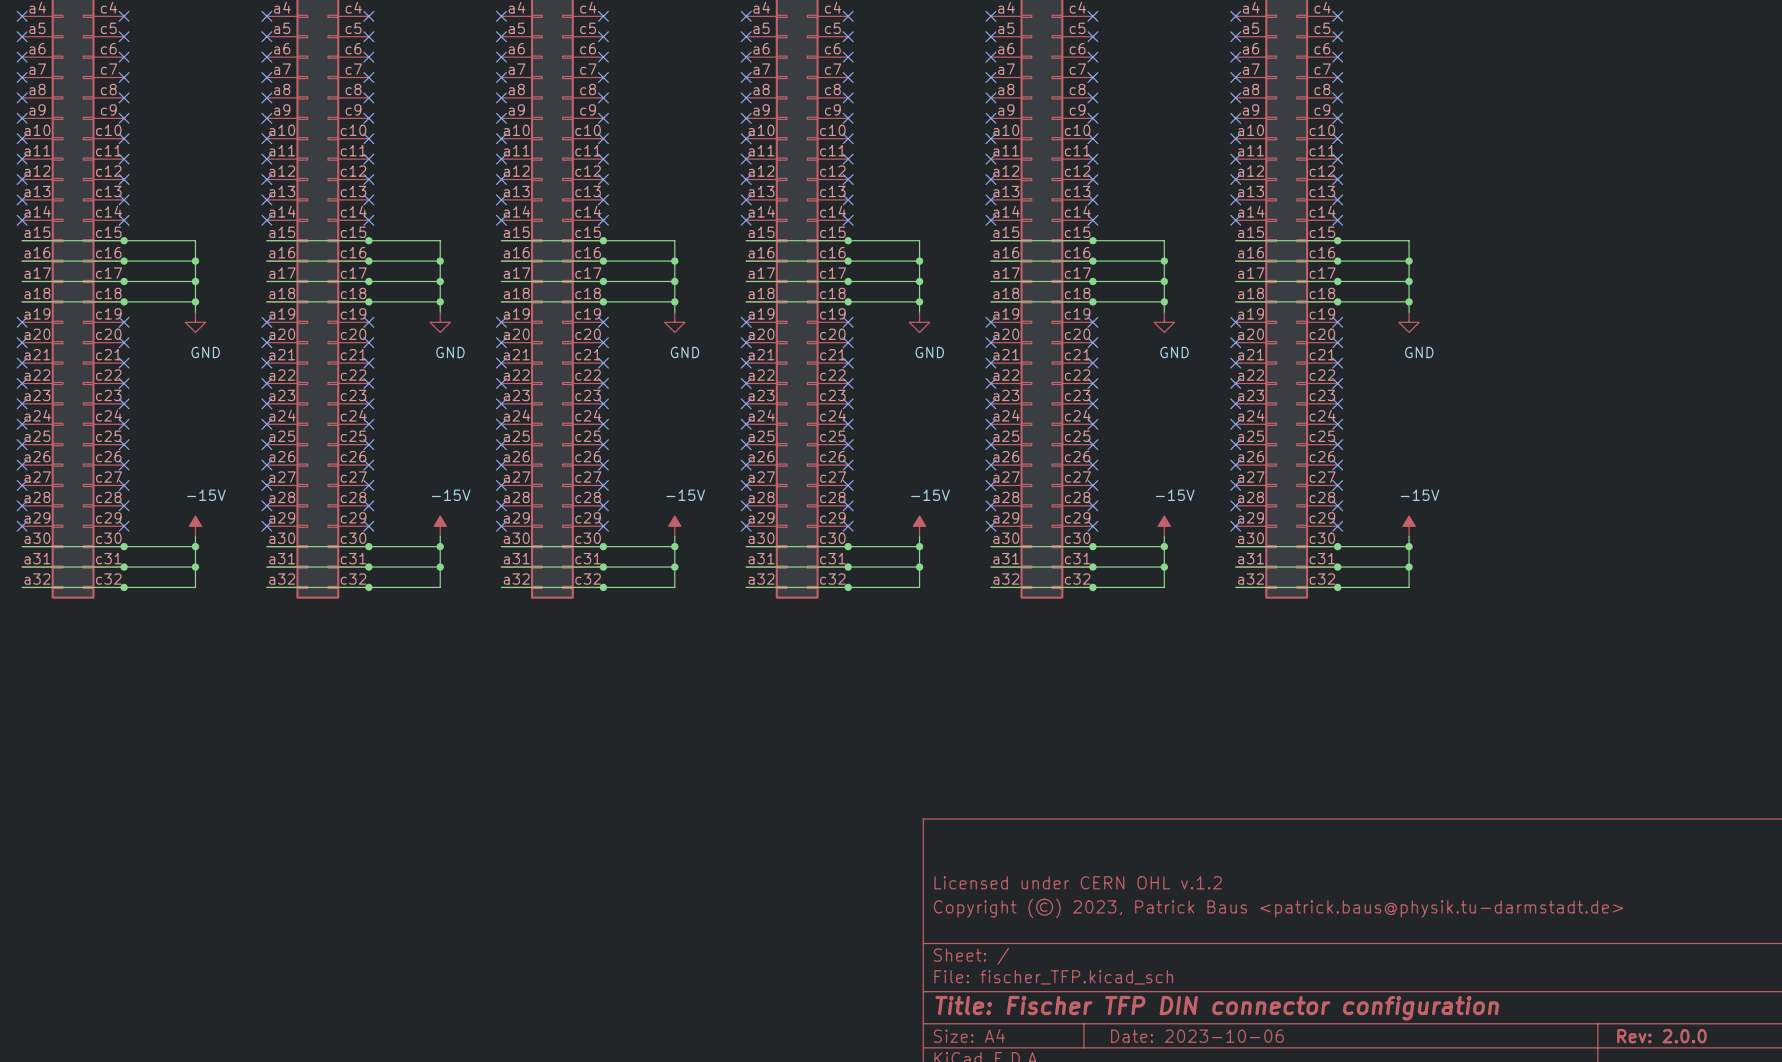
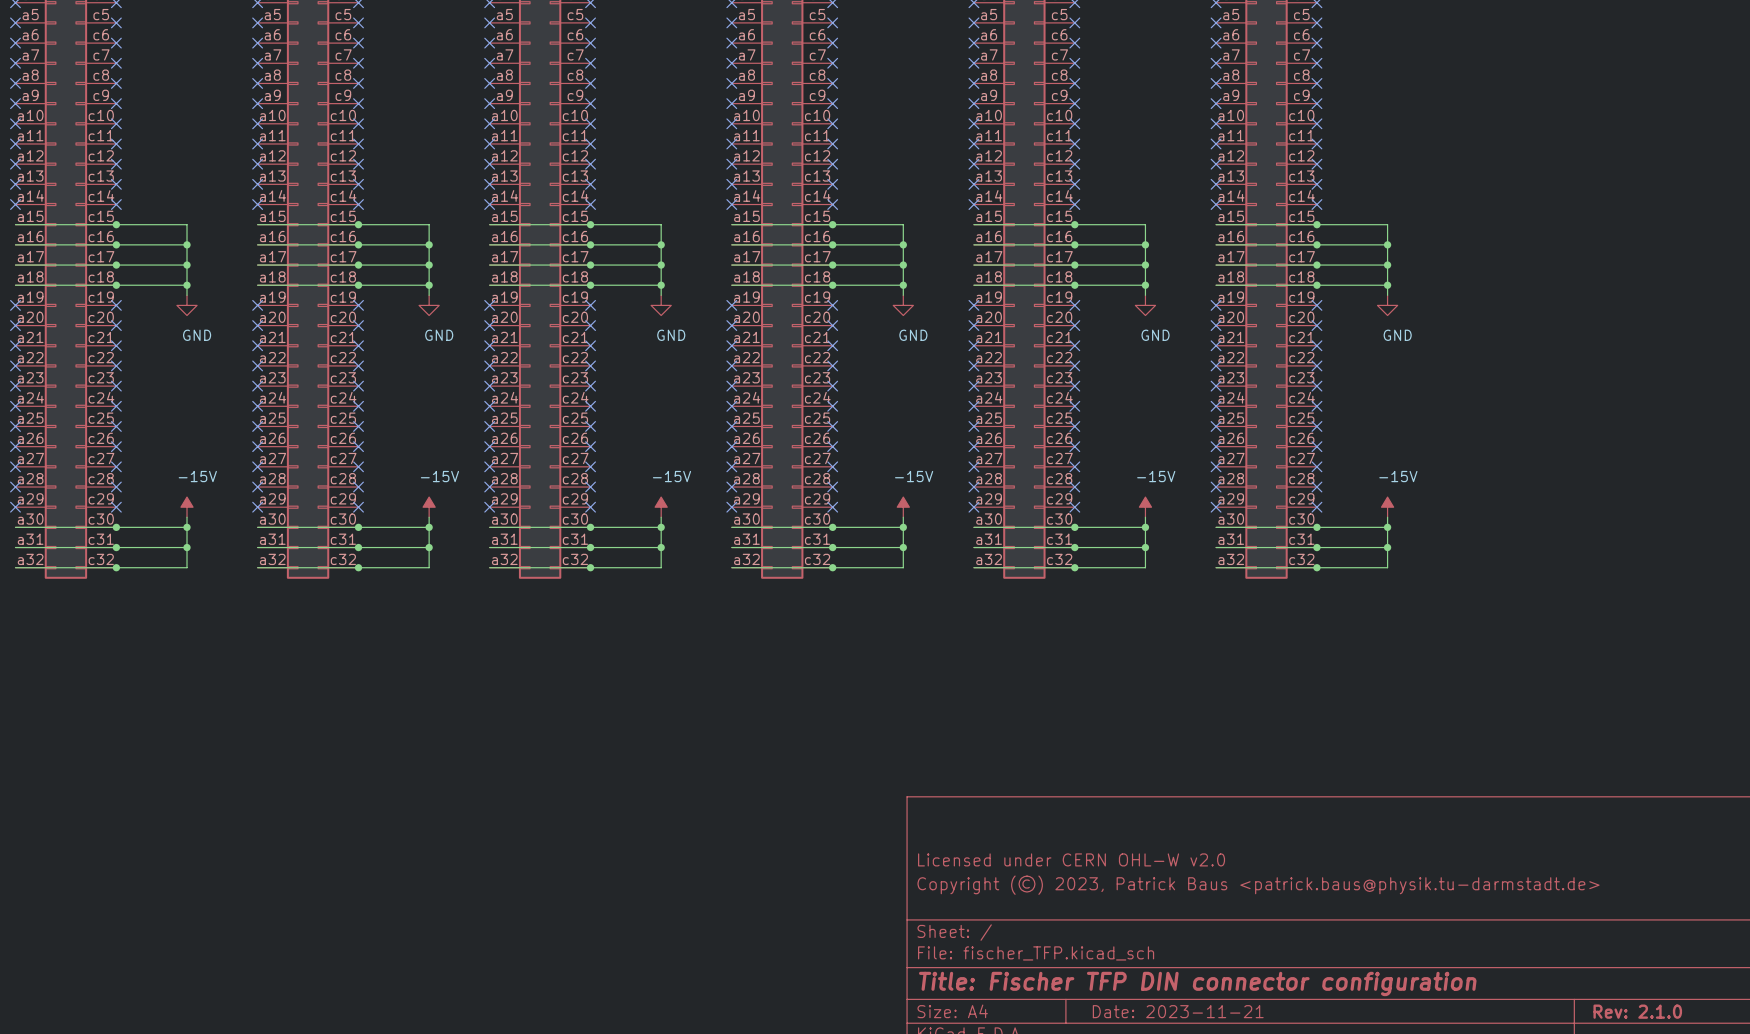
title block: Licensed under CERN OHL v.1.2 (1078, 882) -> Licensed under CERN OHL-W v2.0 (1071, 859)
title block: Date: 2023-10-06 (1197, 1036) -> Date: 2023-11-21 (1178, 1011)
title block: Rev: 2.0.0 (1661, 1036) -> Rev: 2.1.0 (1637, 1011)

